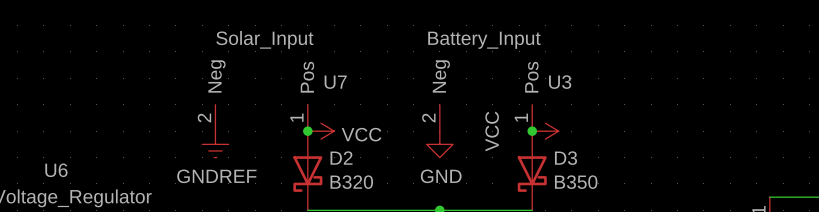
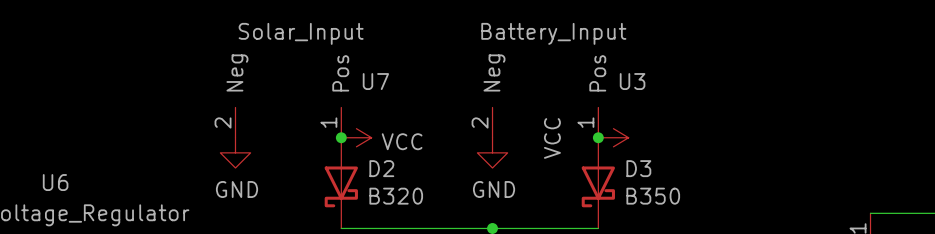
power symbol: GNDREF (215, 144) -> GND (235, 152)

